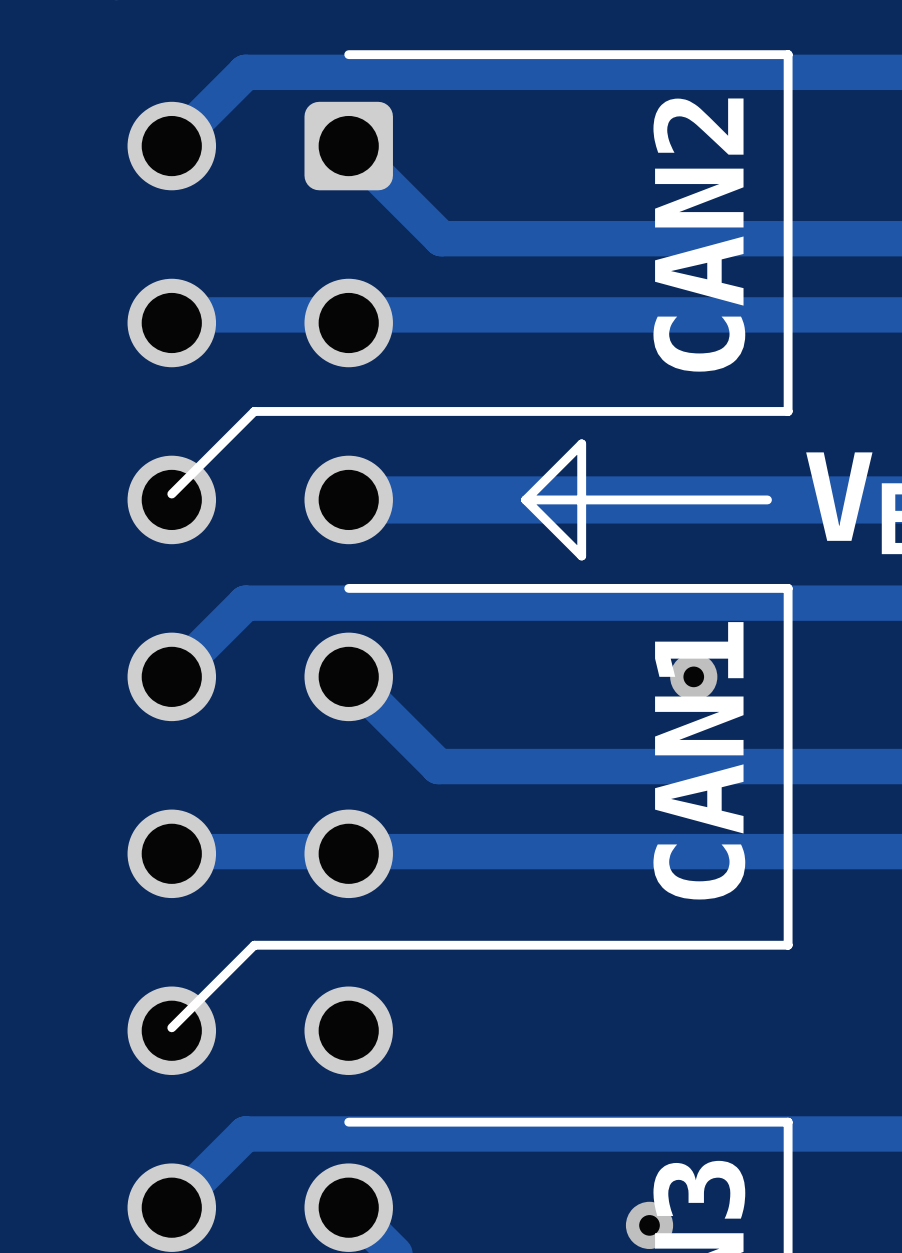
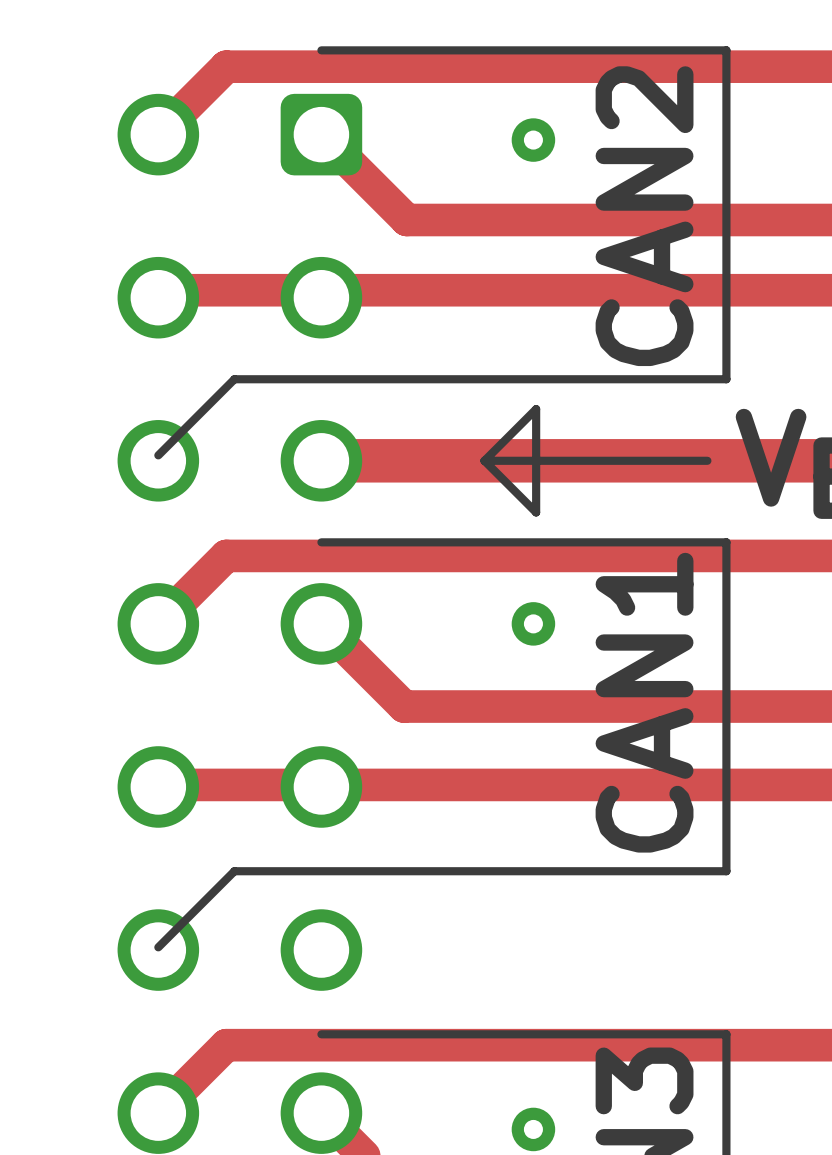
via: none -> (533, 140)
via position: (693, 676) -> (533, 623)
via position: (649, 1225) -> (533, 1129)

